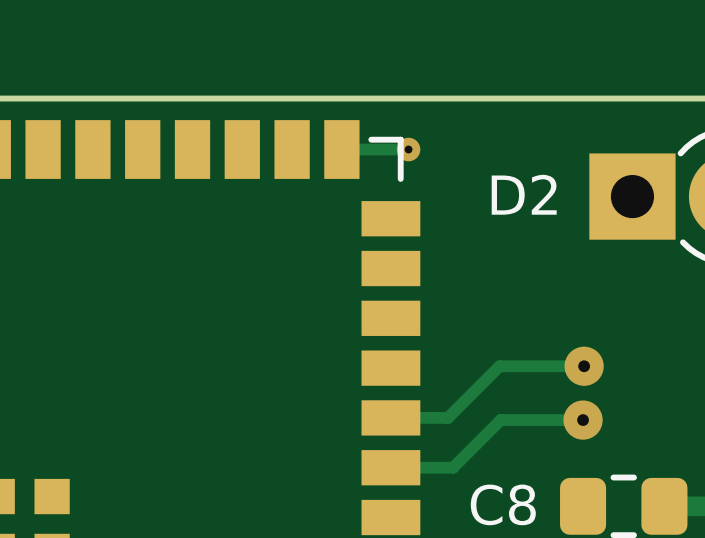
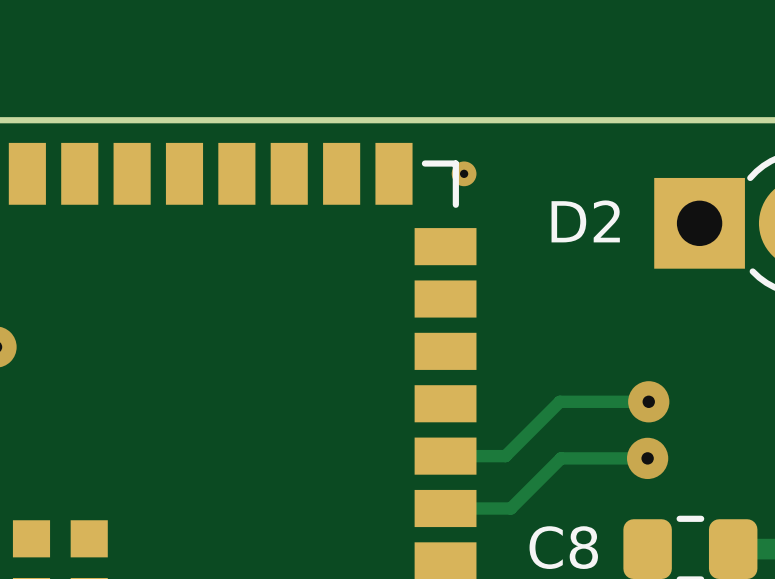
track: (341, 149) (408, 149) -> none

